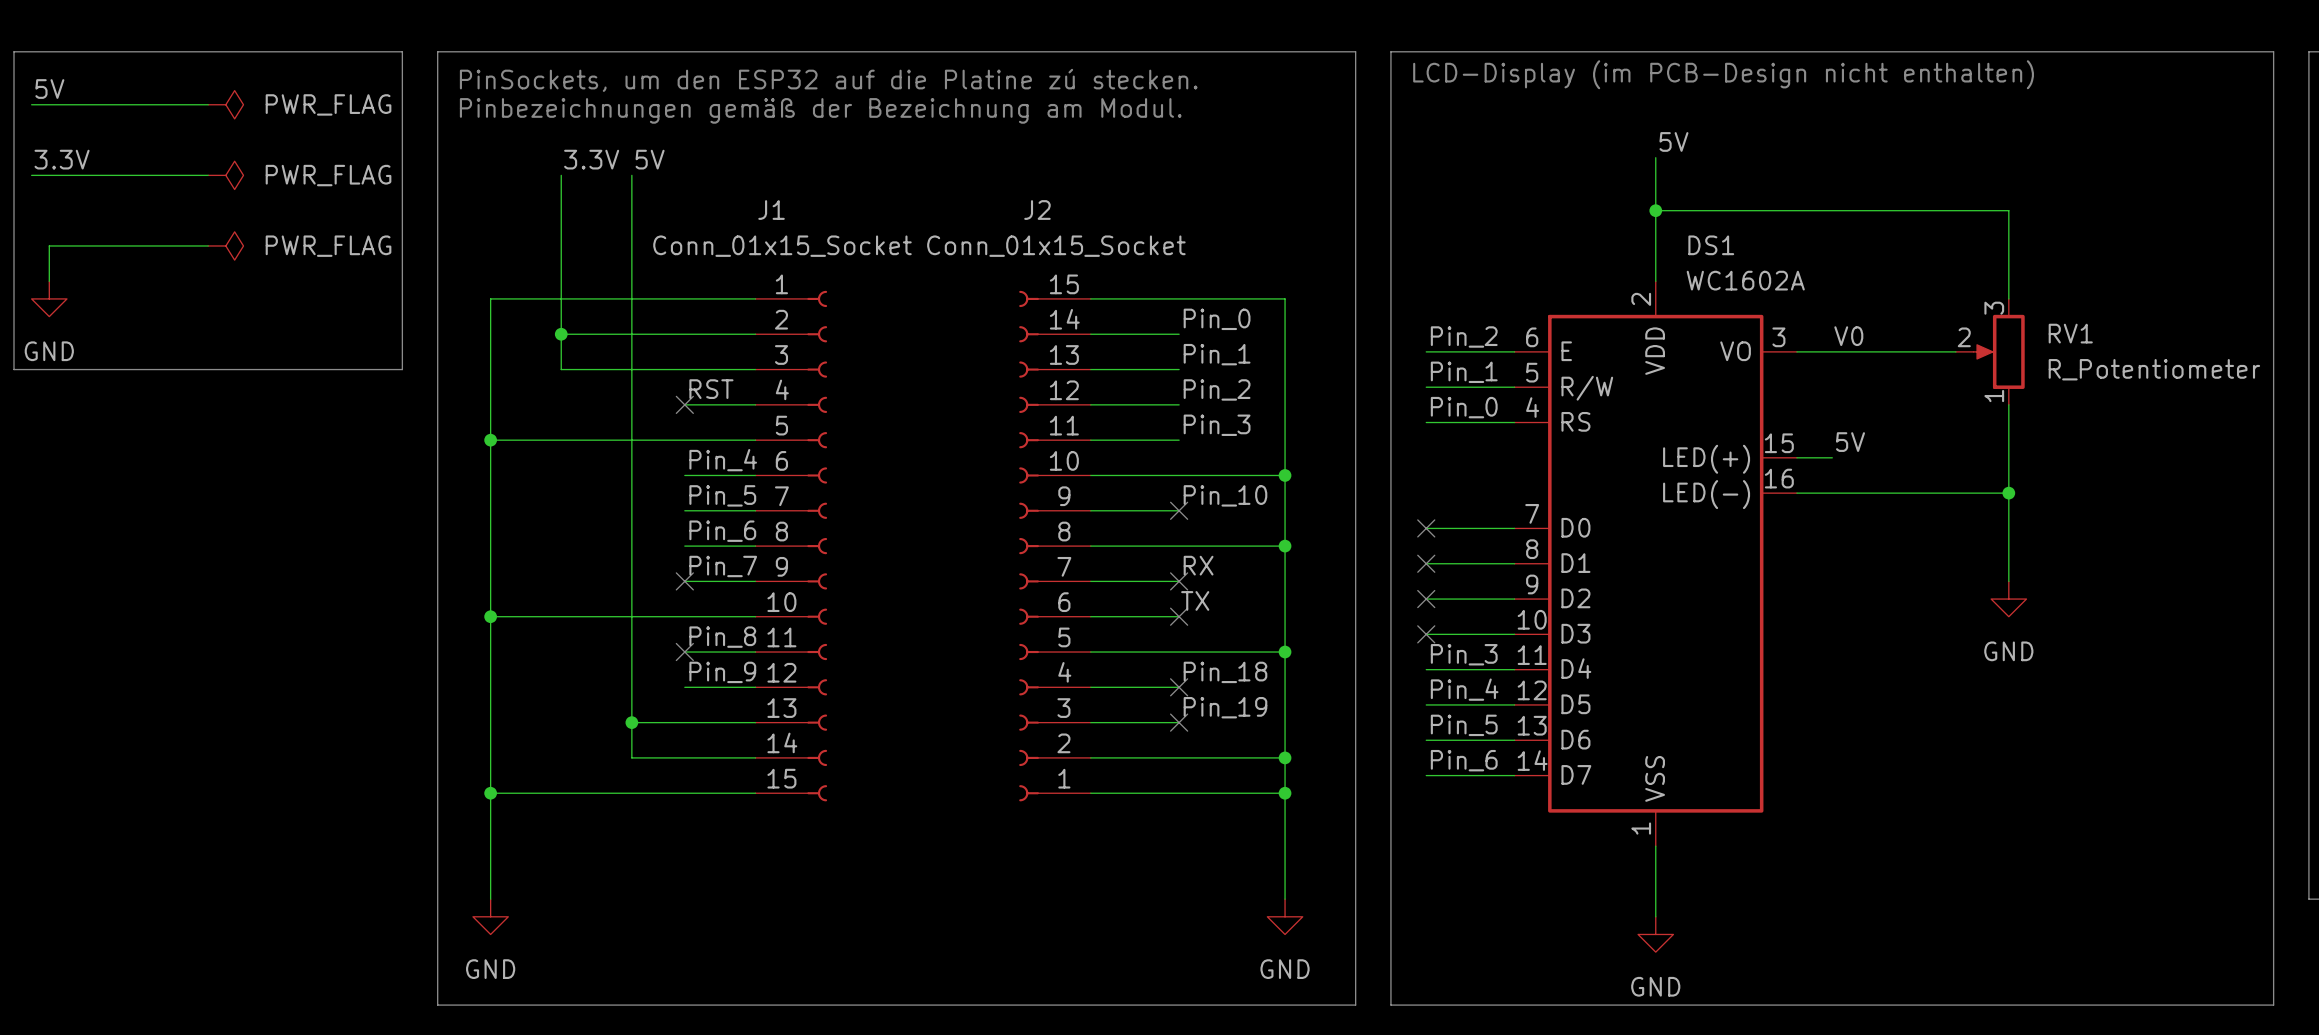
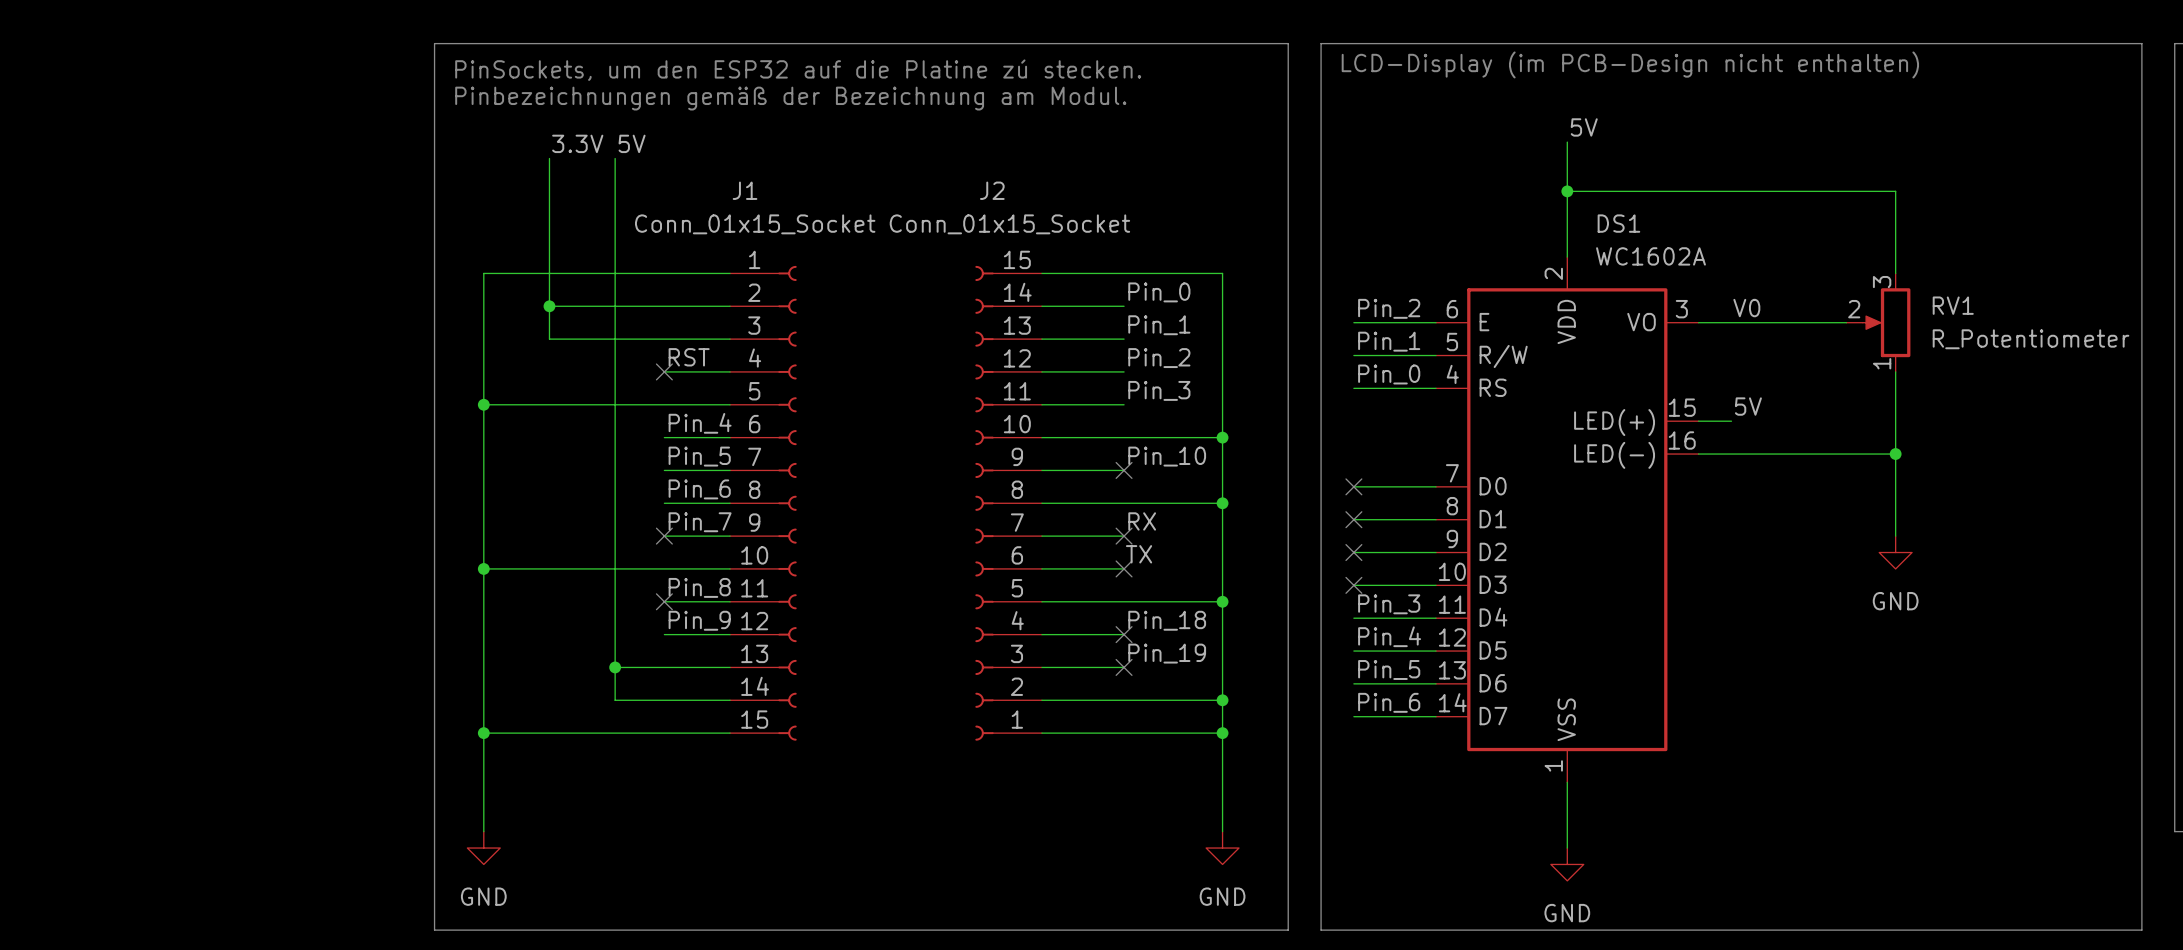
line: (13, 51) (13, 369) (402, 369) (402, 51) (13, 51) -> none
label: 5V (49, 89) -> none
wire: (31, 104) (208, 104) -> none
power symbol: PWR_FLAG (225, 104) -> none
label: 3.3V (62, 159) -> none
wire: (31, 175) (208, 175) -> none
power symbol: PWR_FLAG (225, 175) -> none
wire: (208, 245) (49, 245) (49, 281) -> none
power symbol: PWR_FLAG (225, 245) -> none
power symbol: GND (49, 298) -> none

